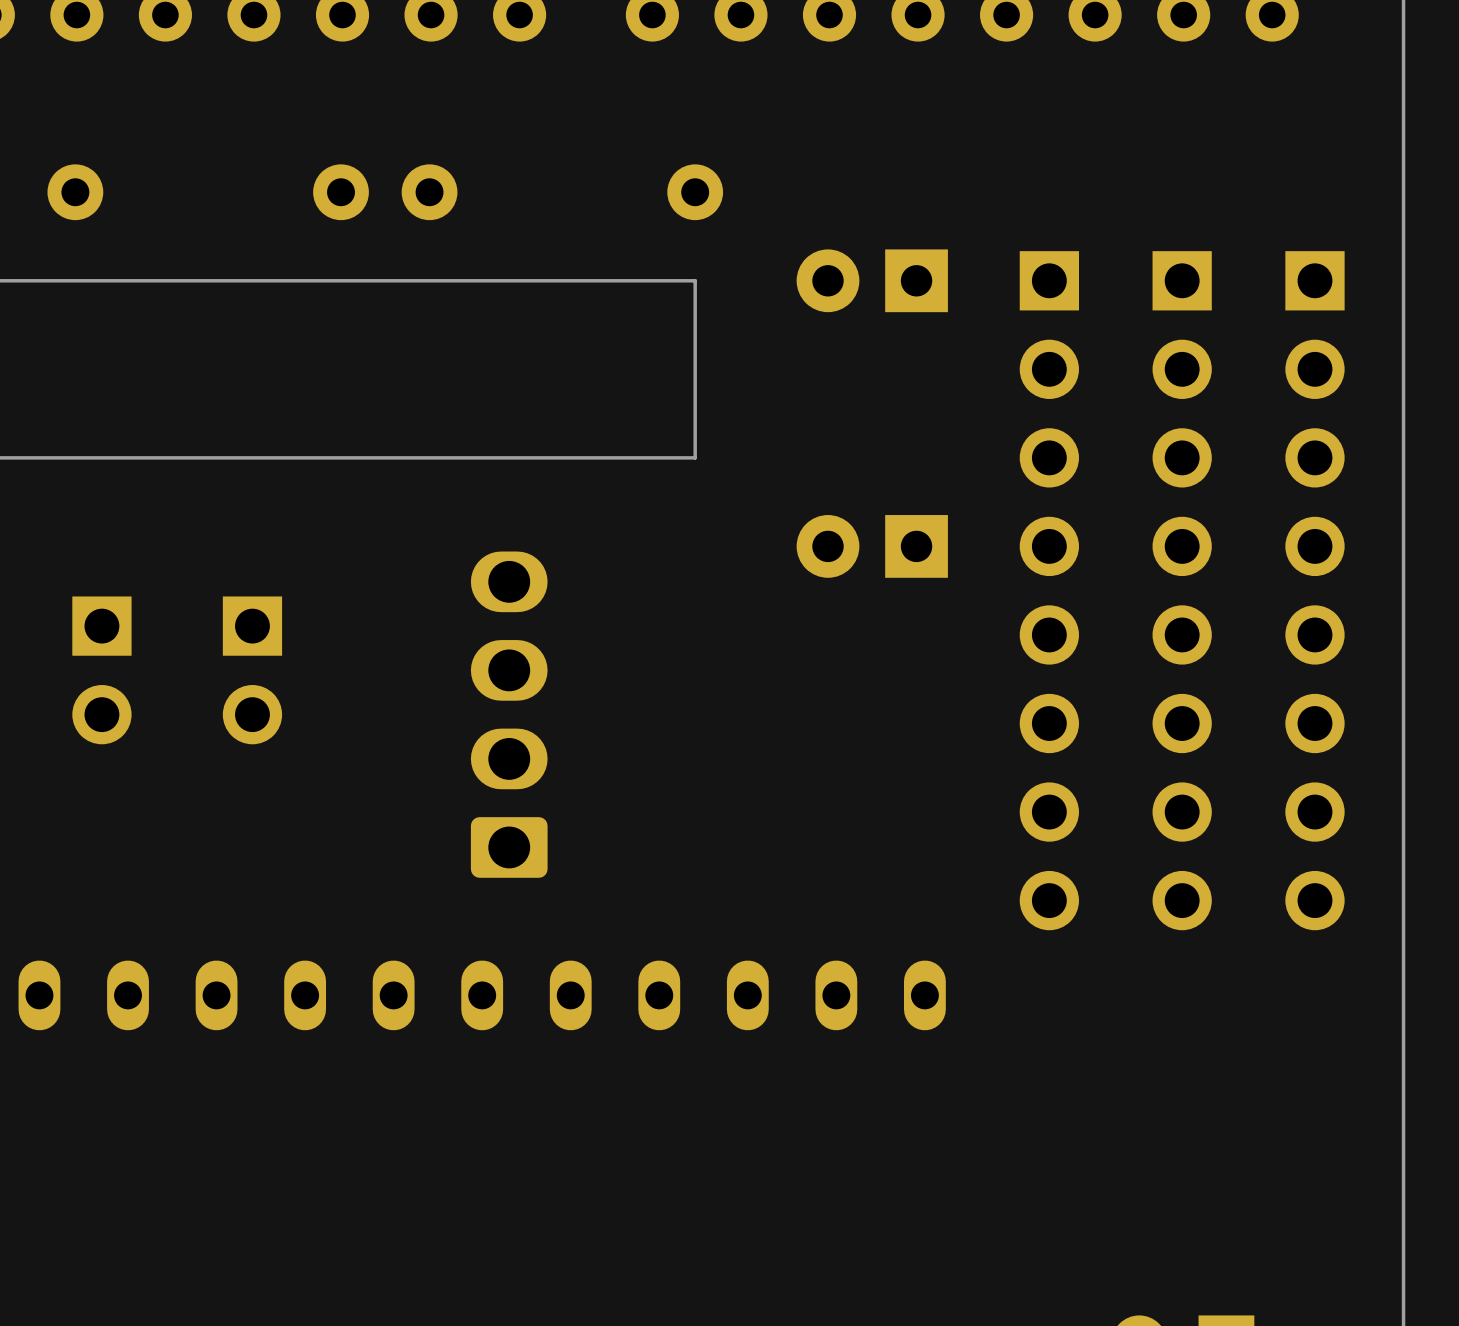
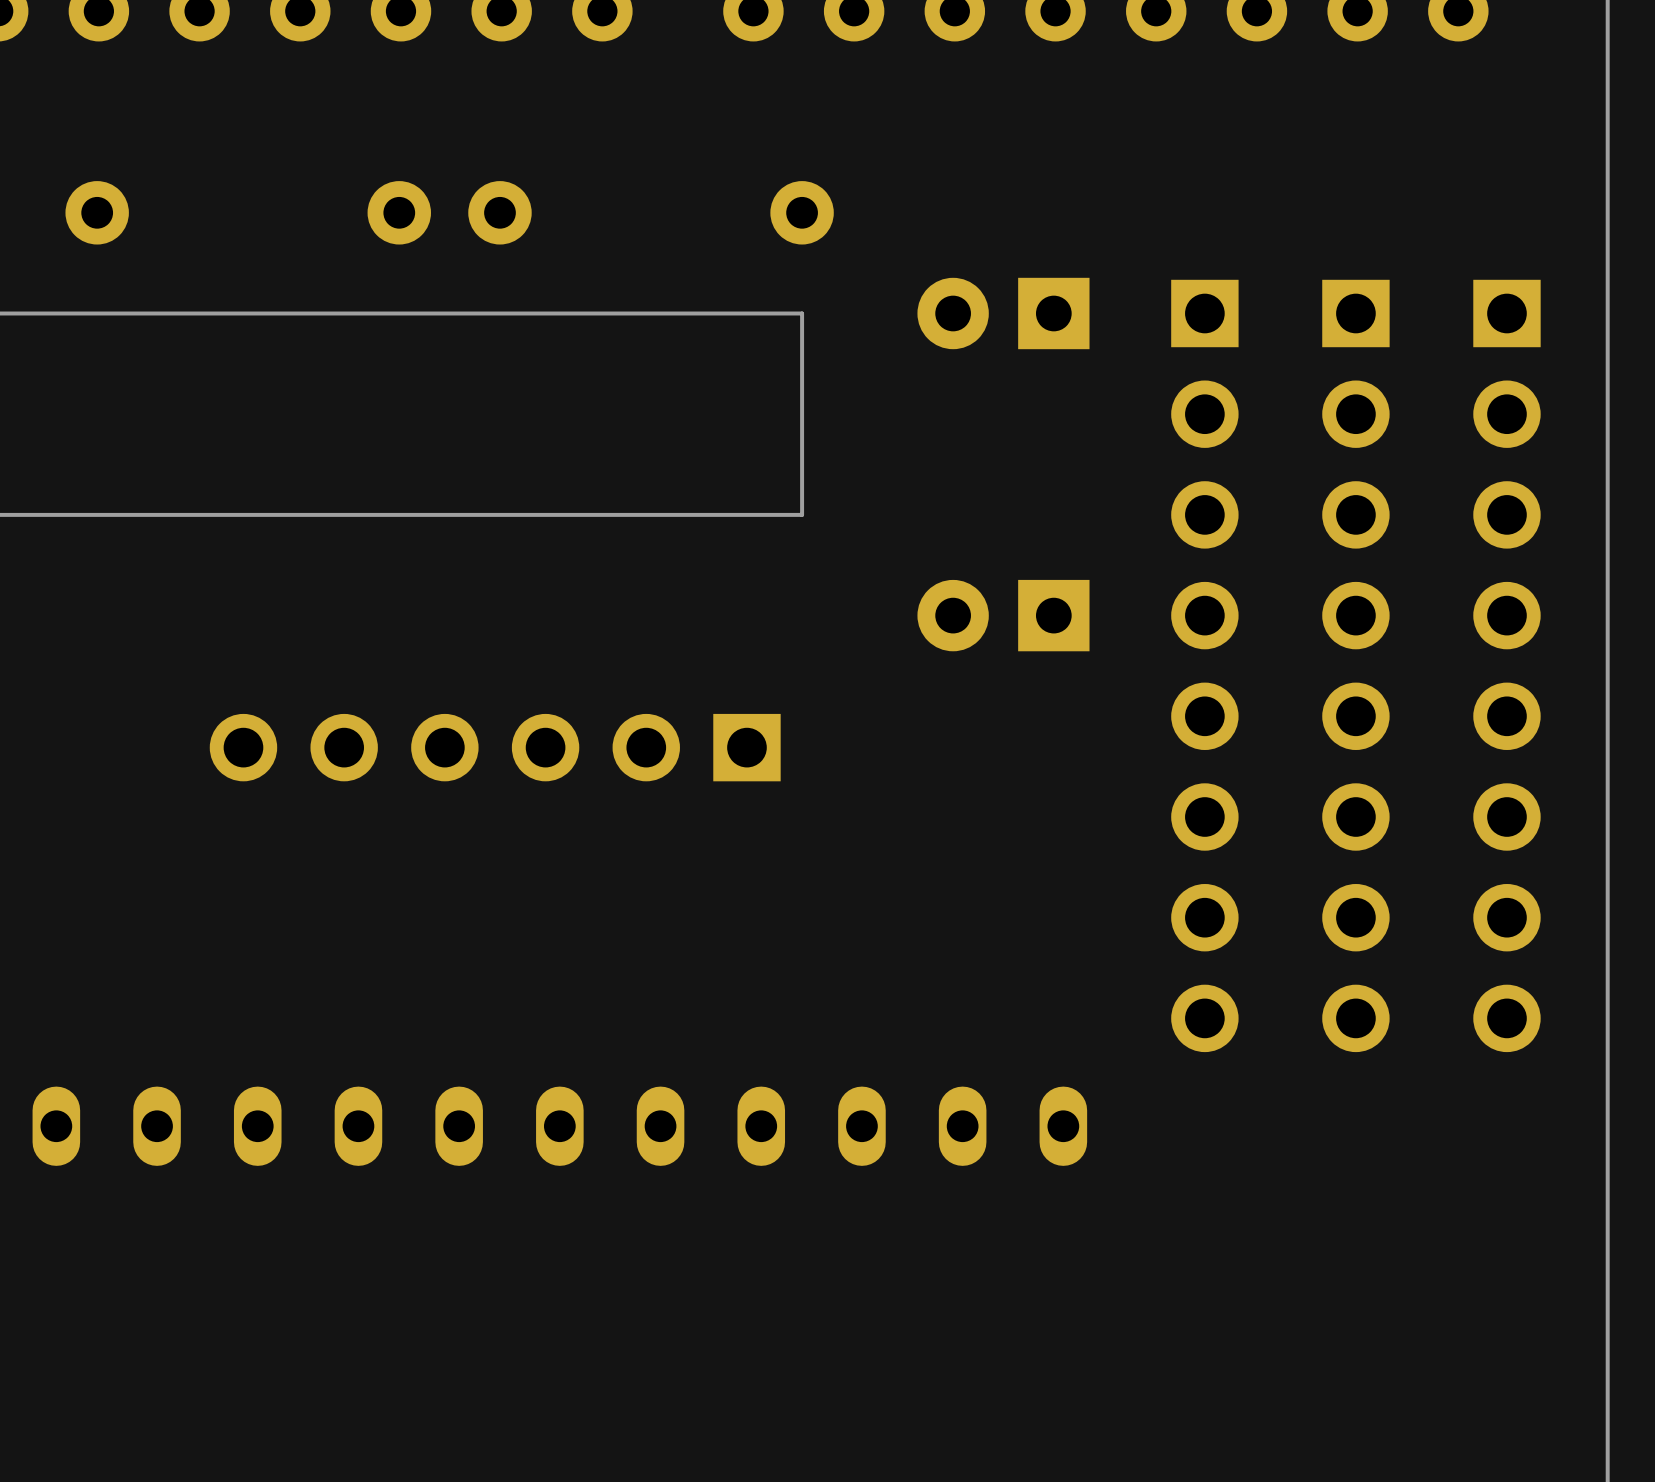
part: none -> (495, 747)
part: (101, 670) -> none
part: (252, 670) -> none
part: (509, 714) -> none

